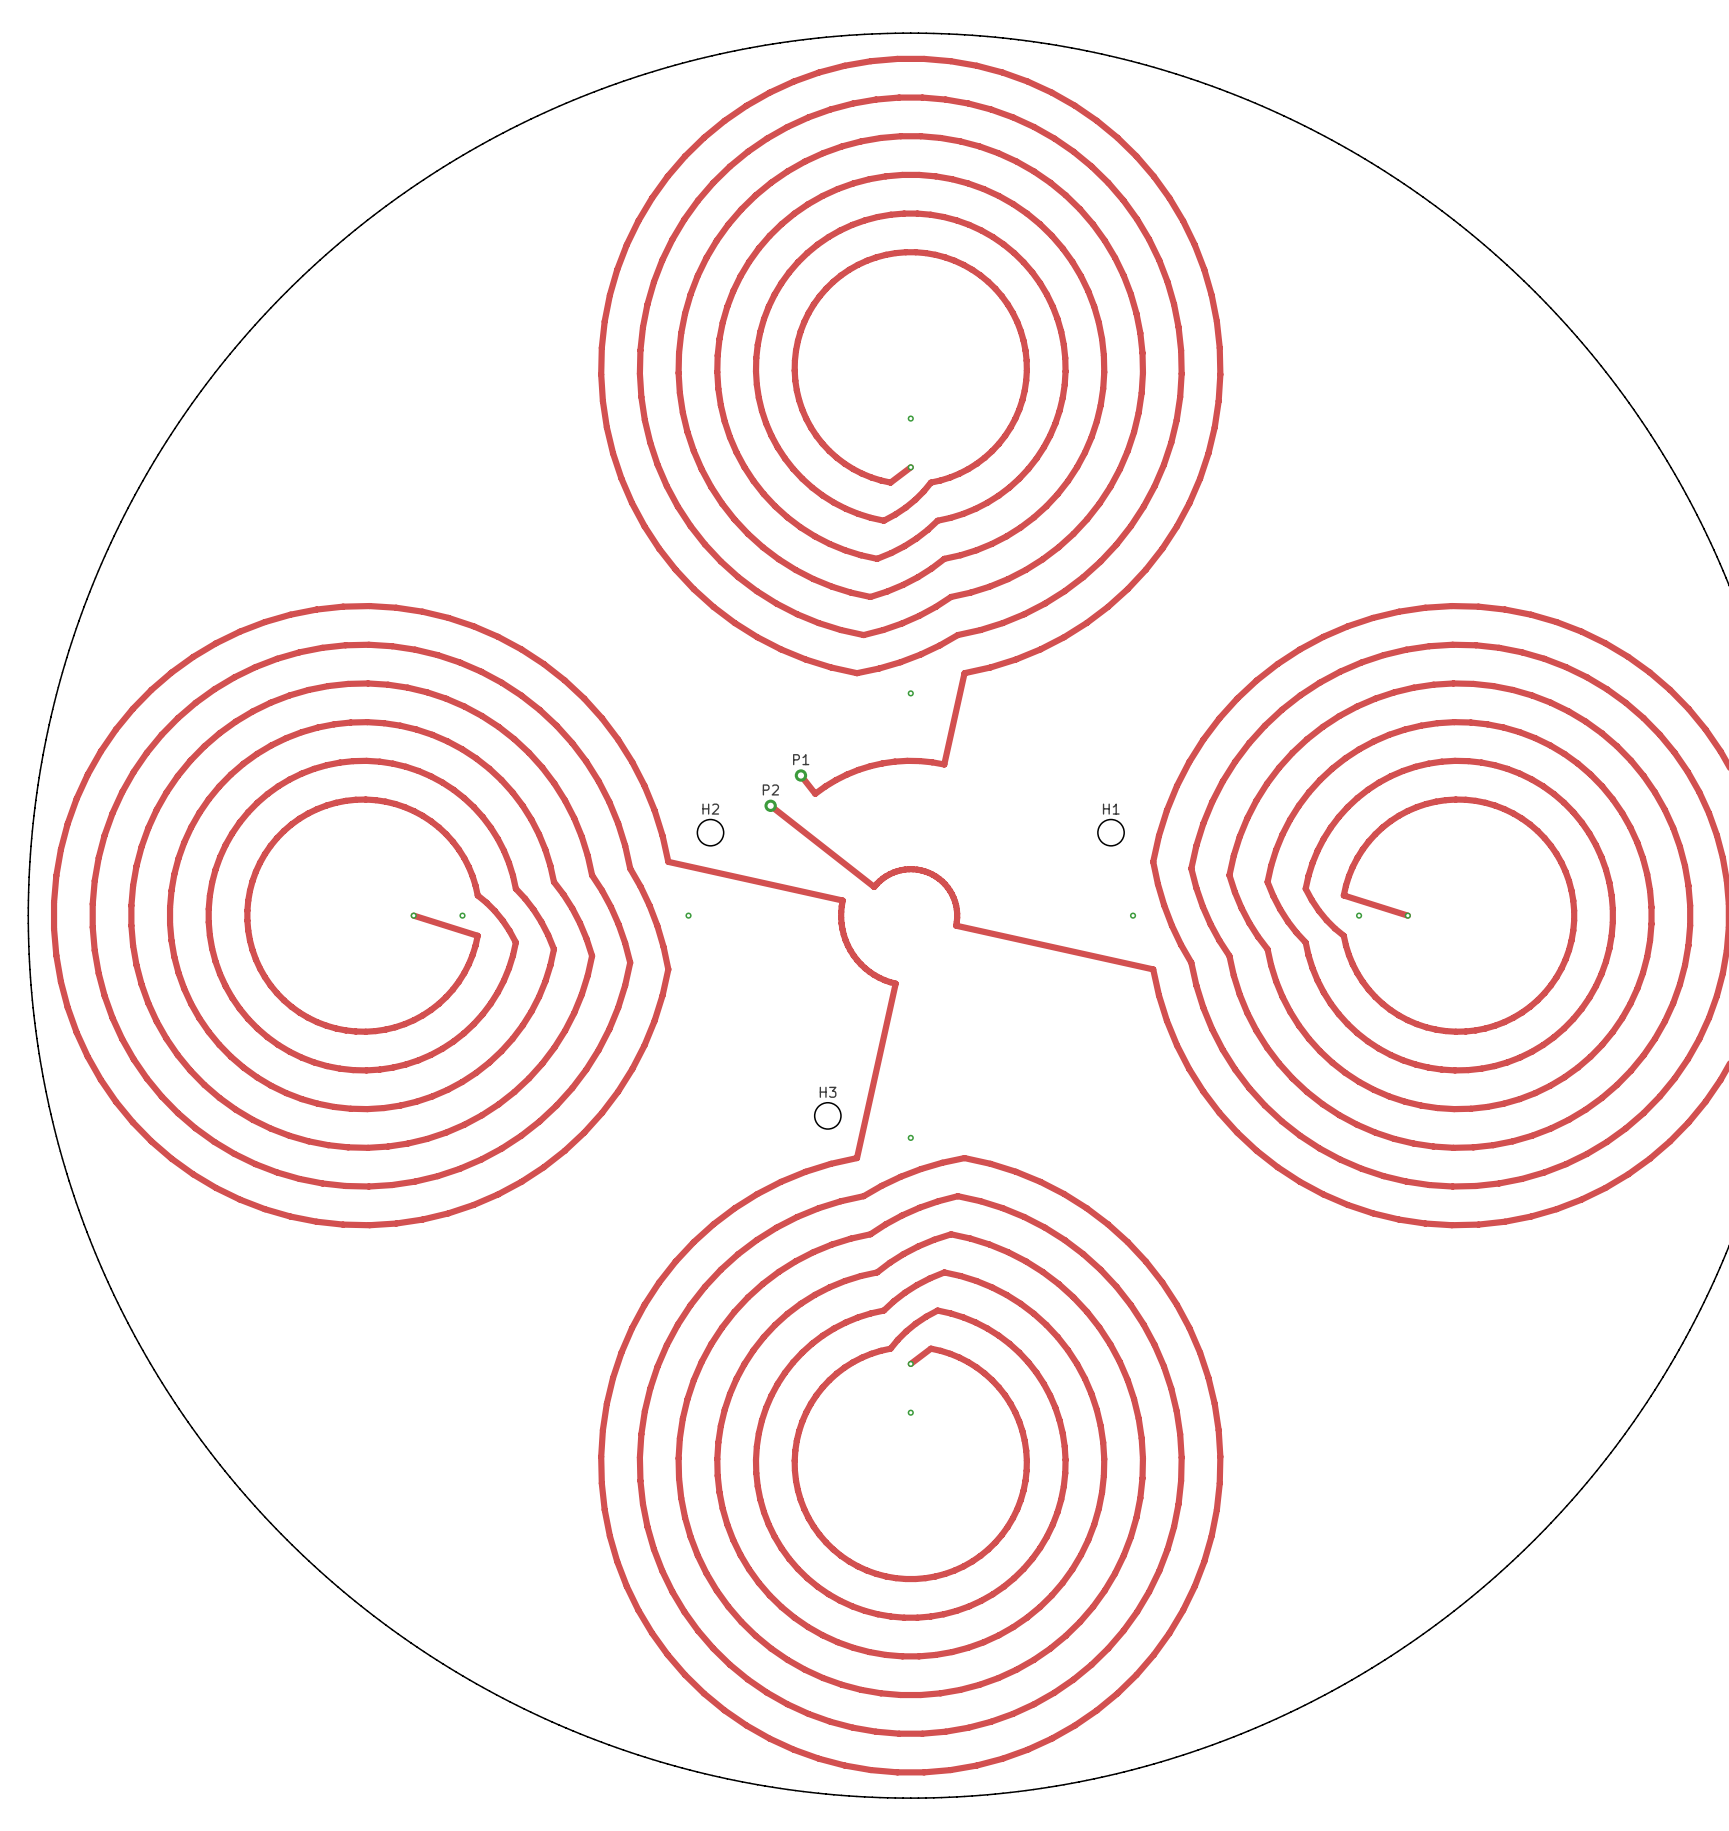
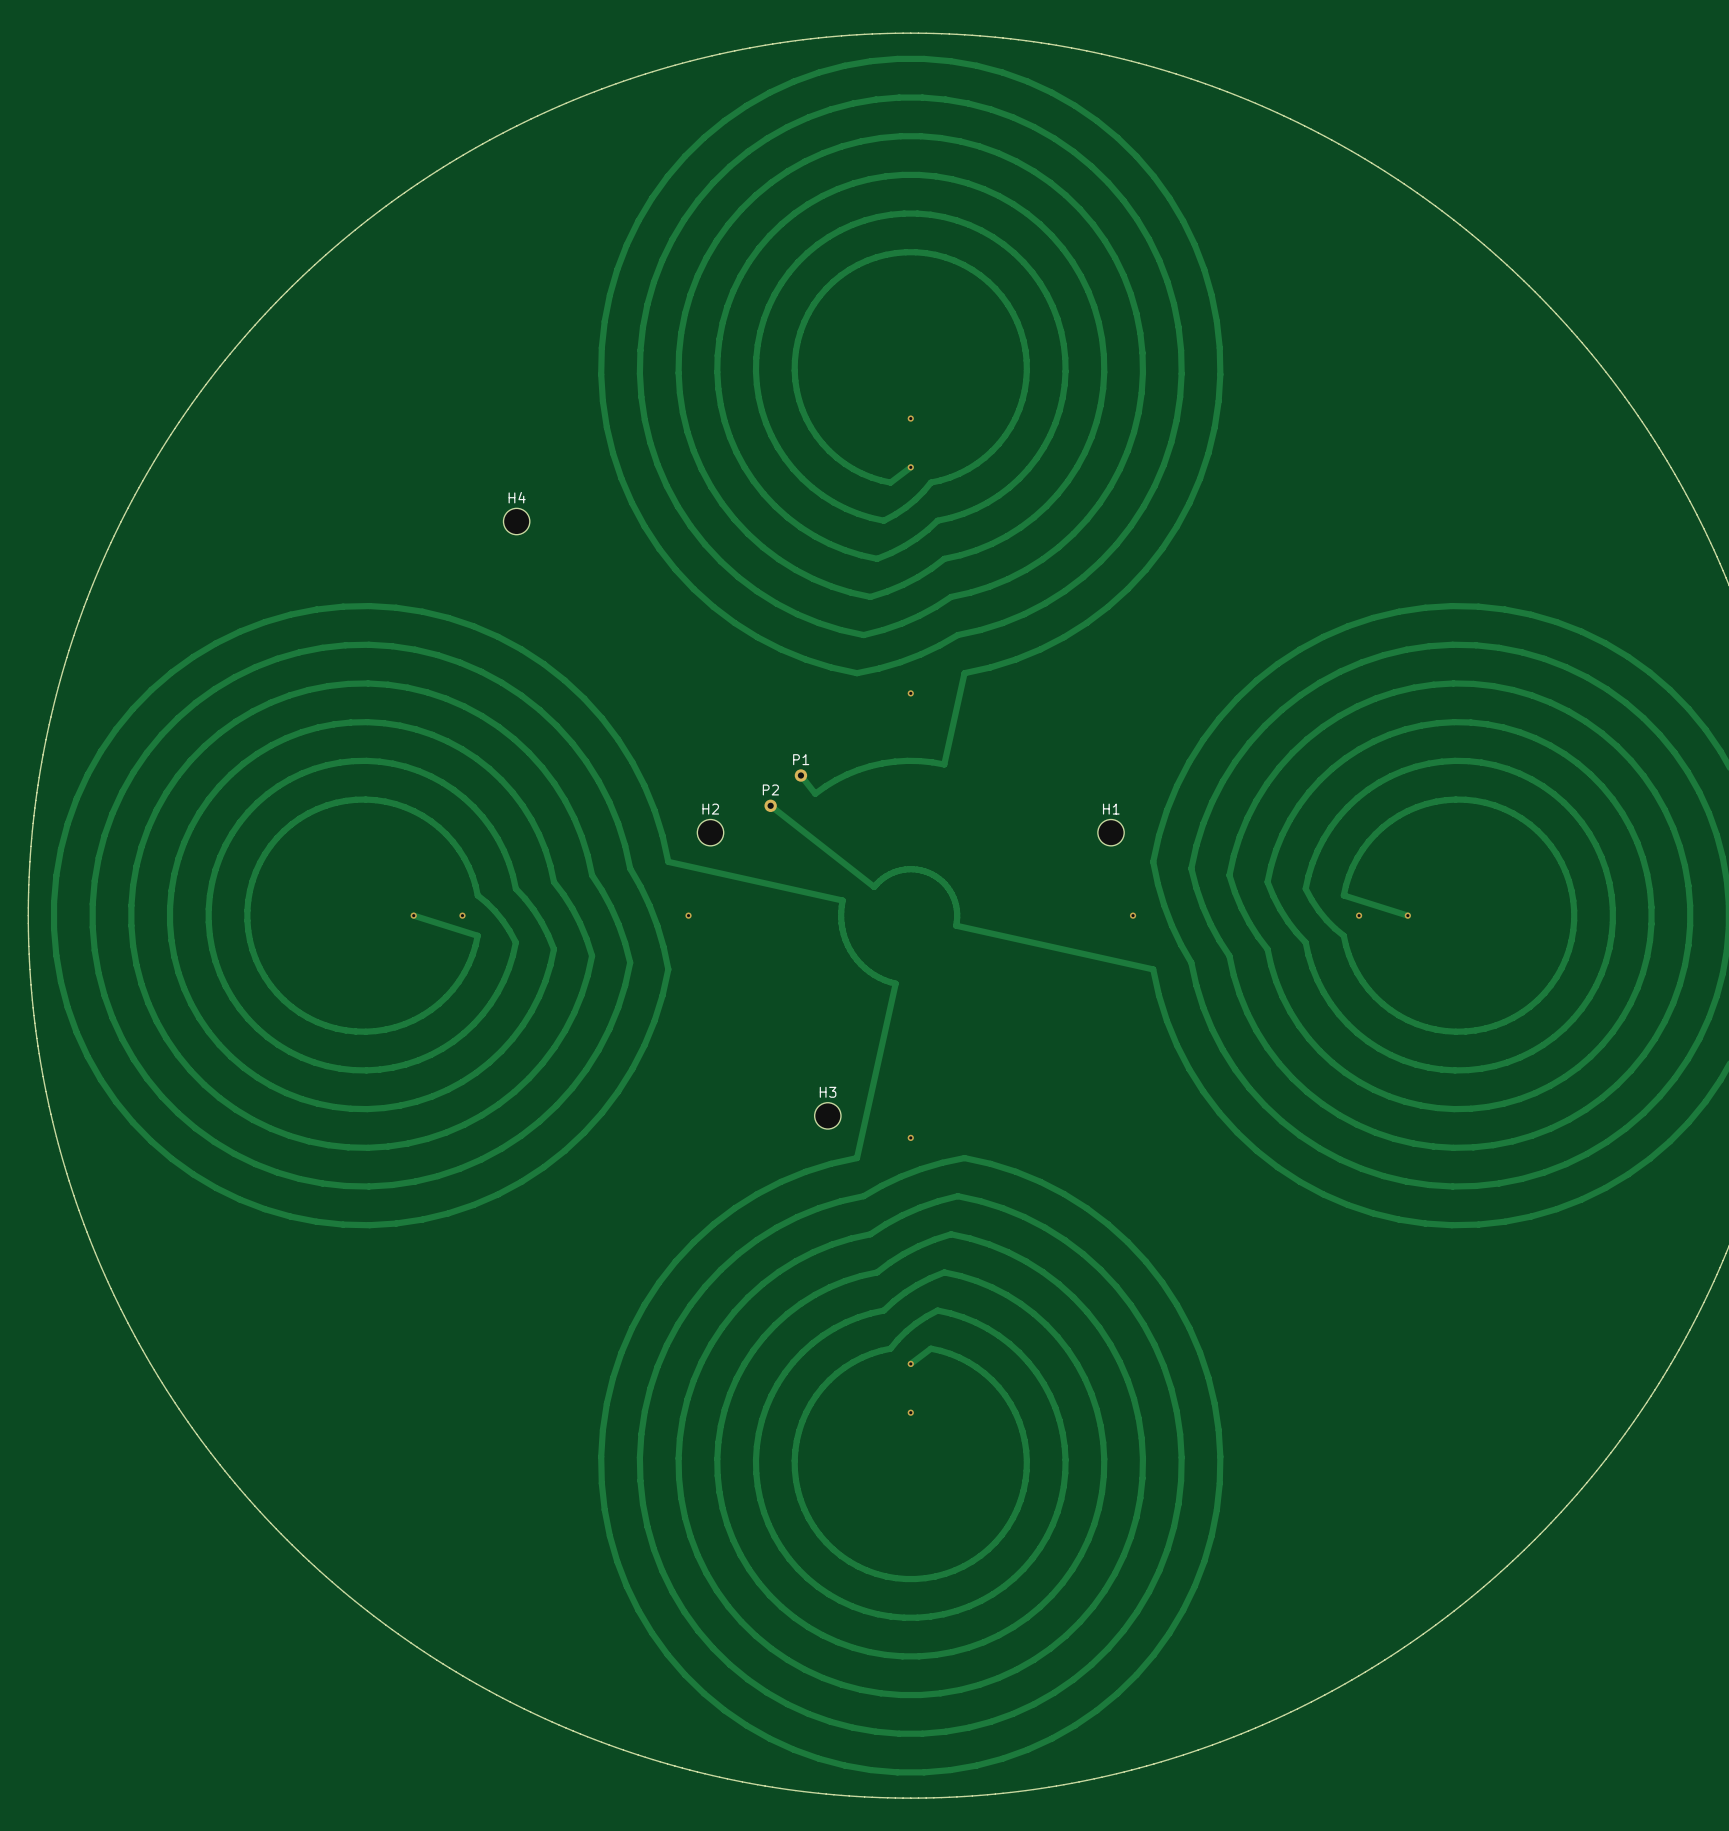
H4: none -> (516, 521)

